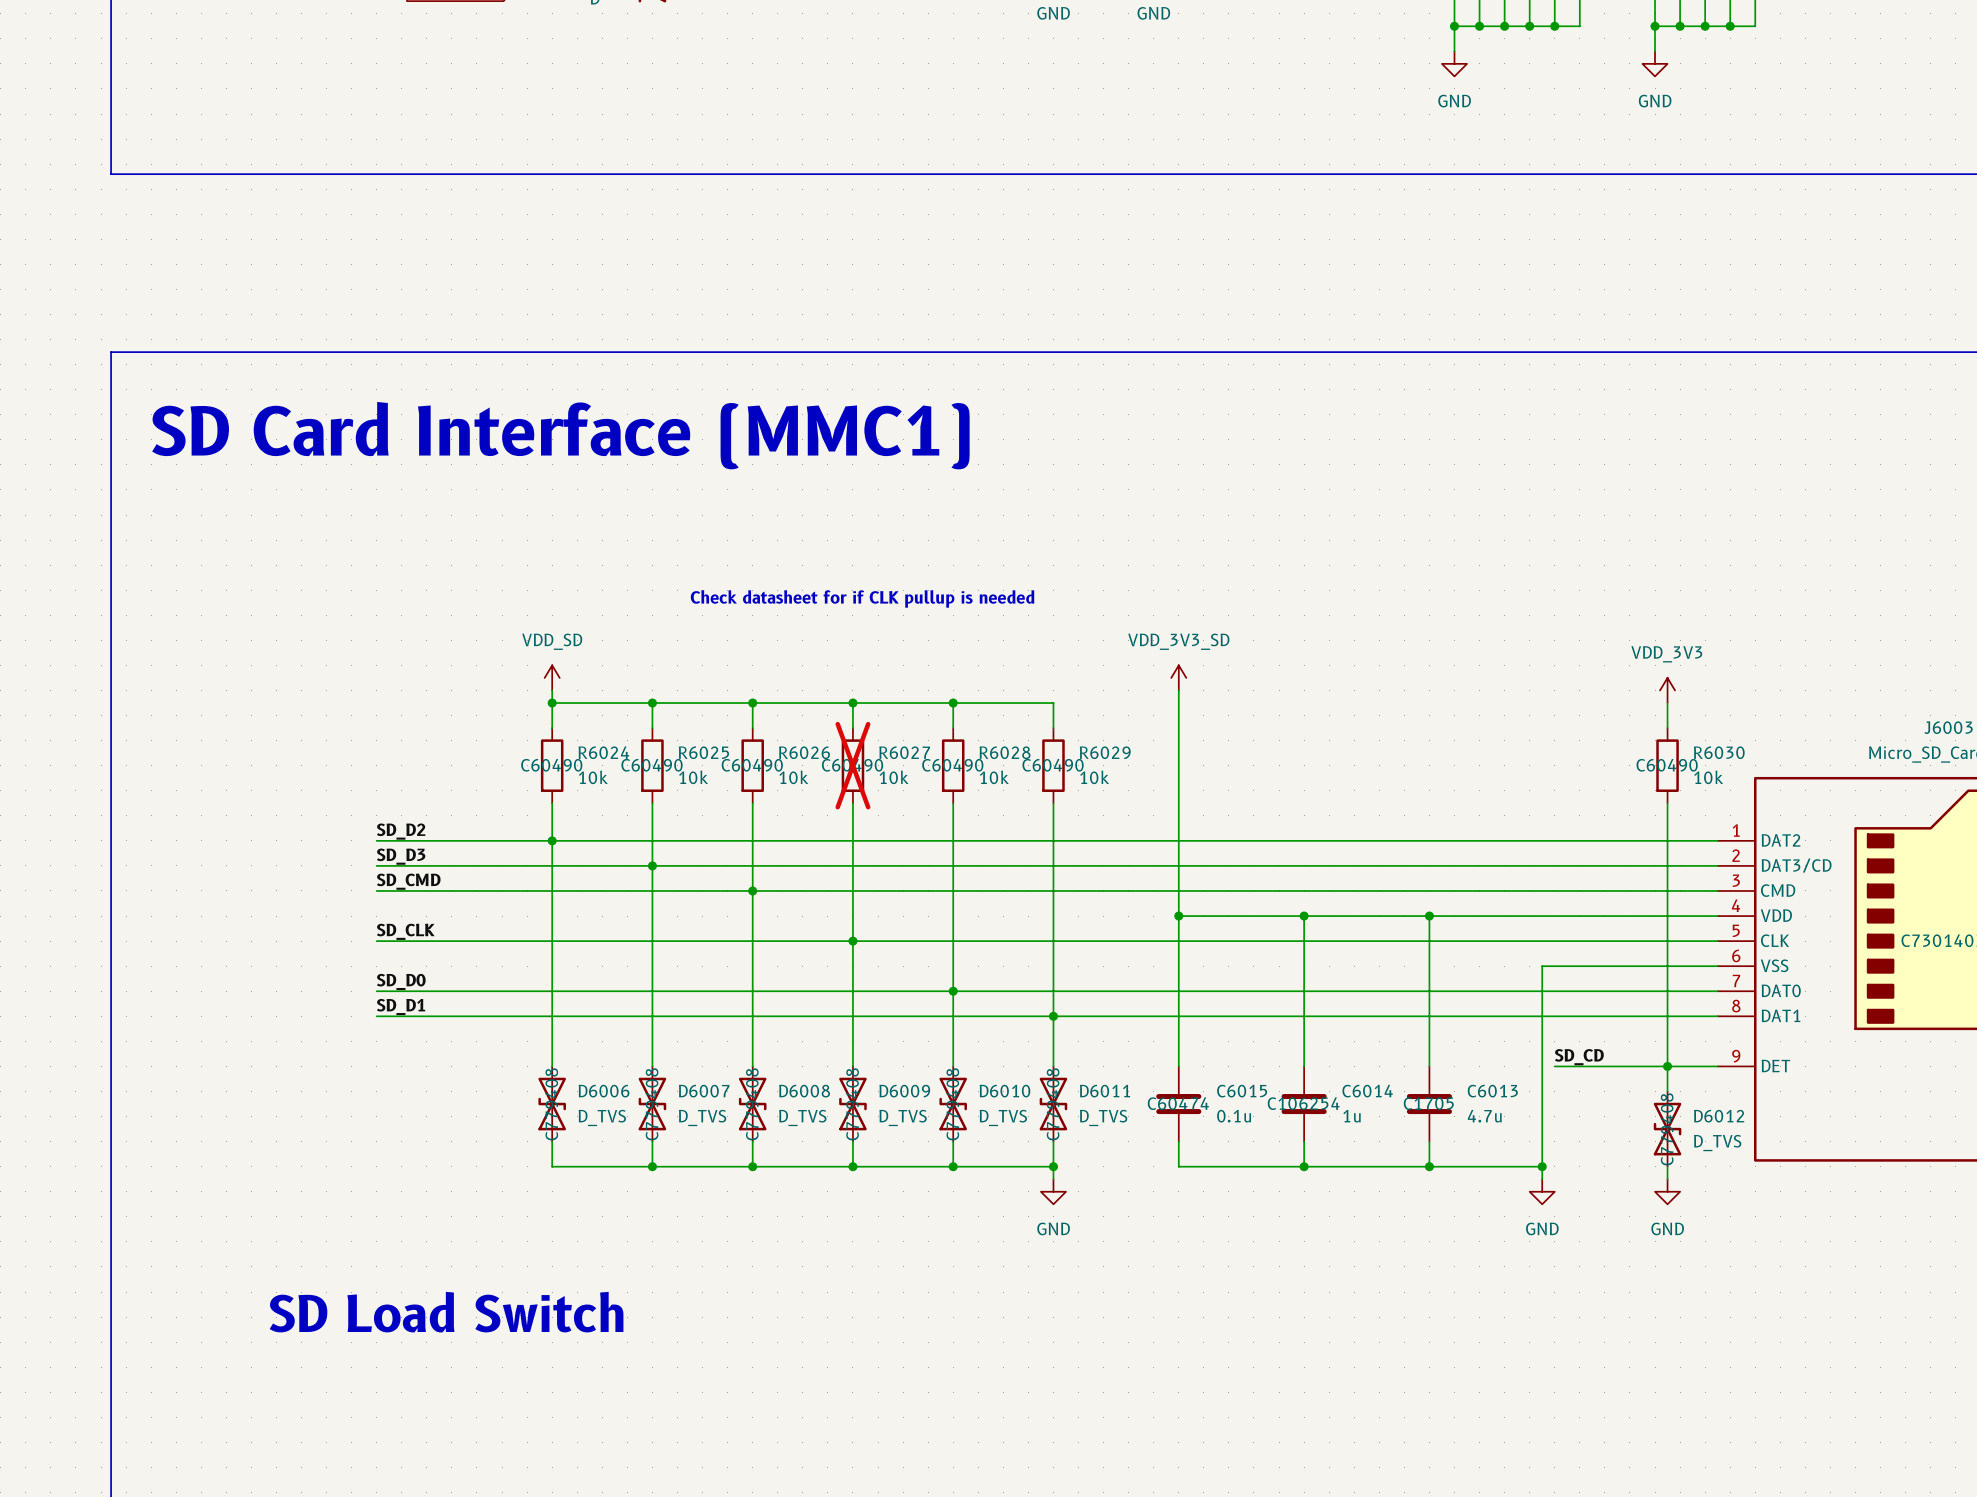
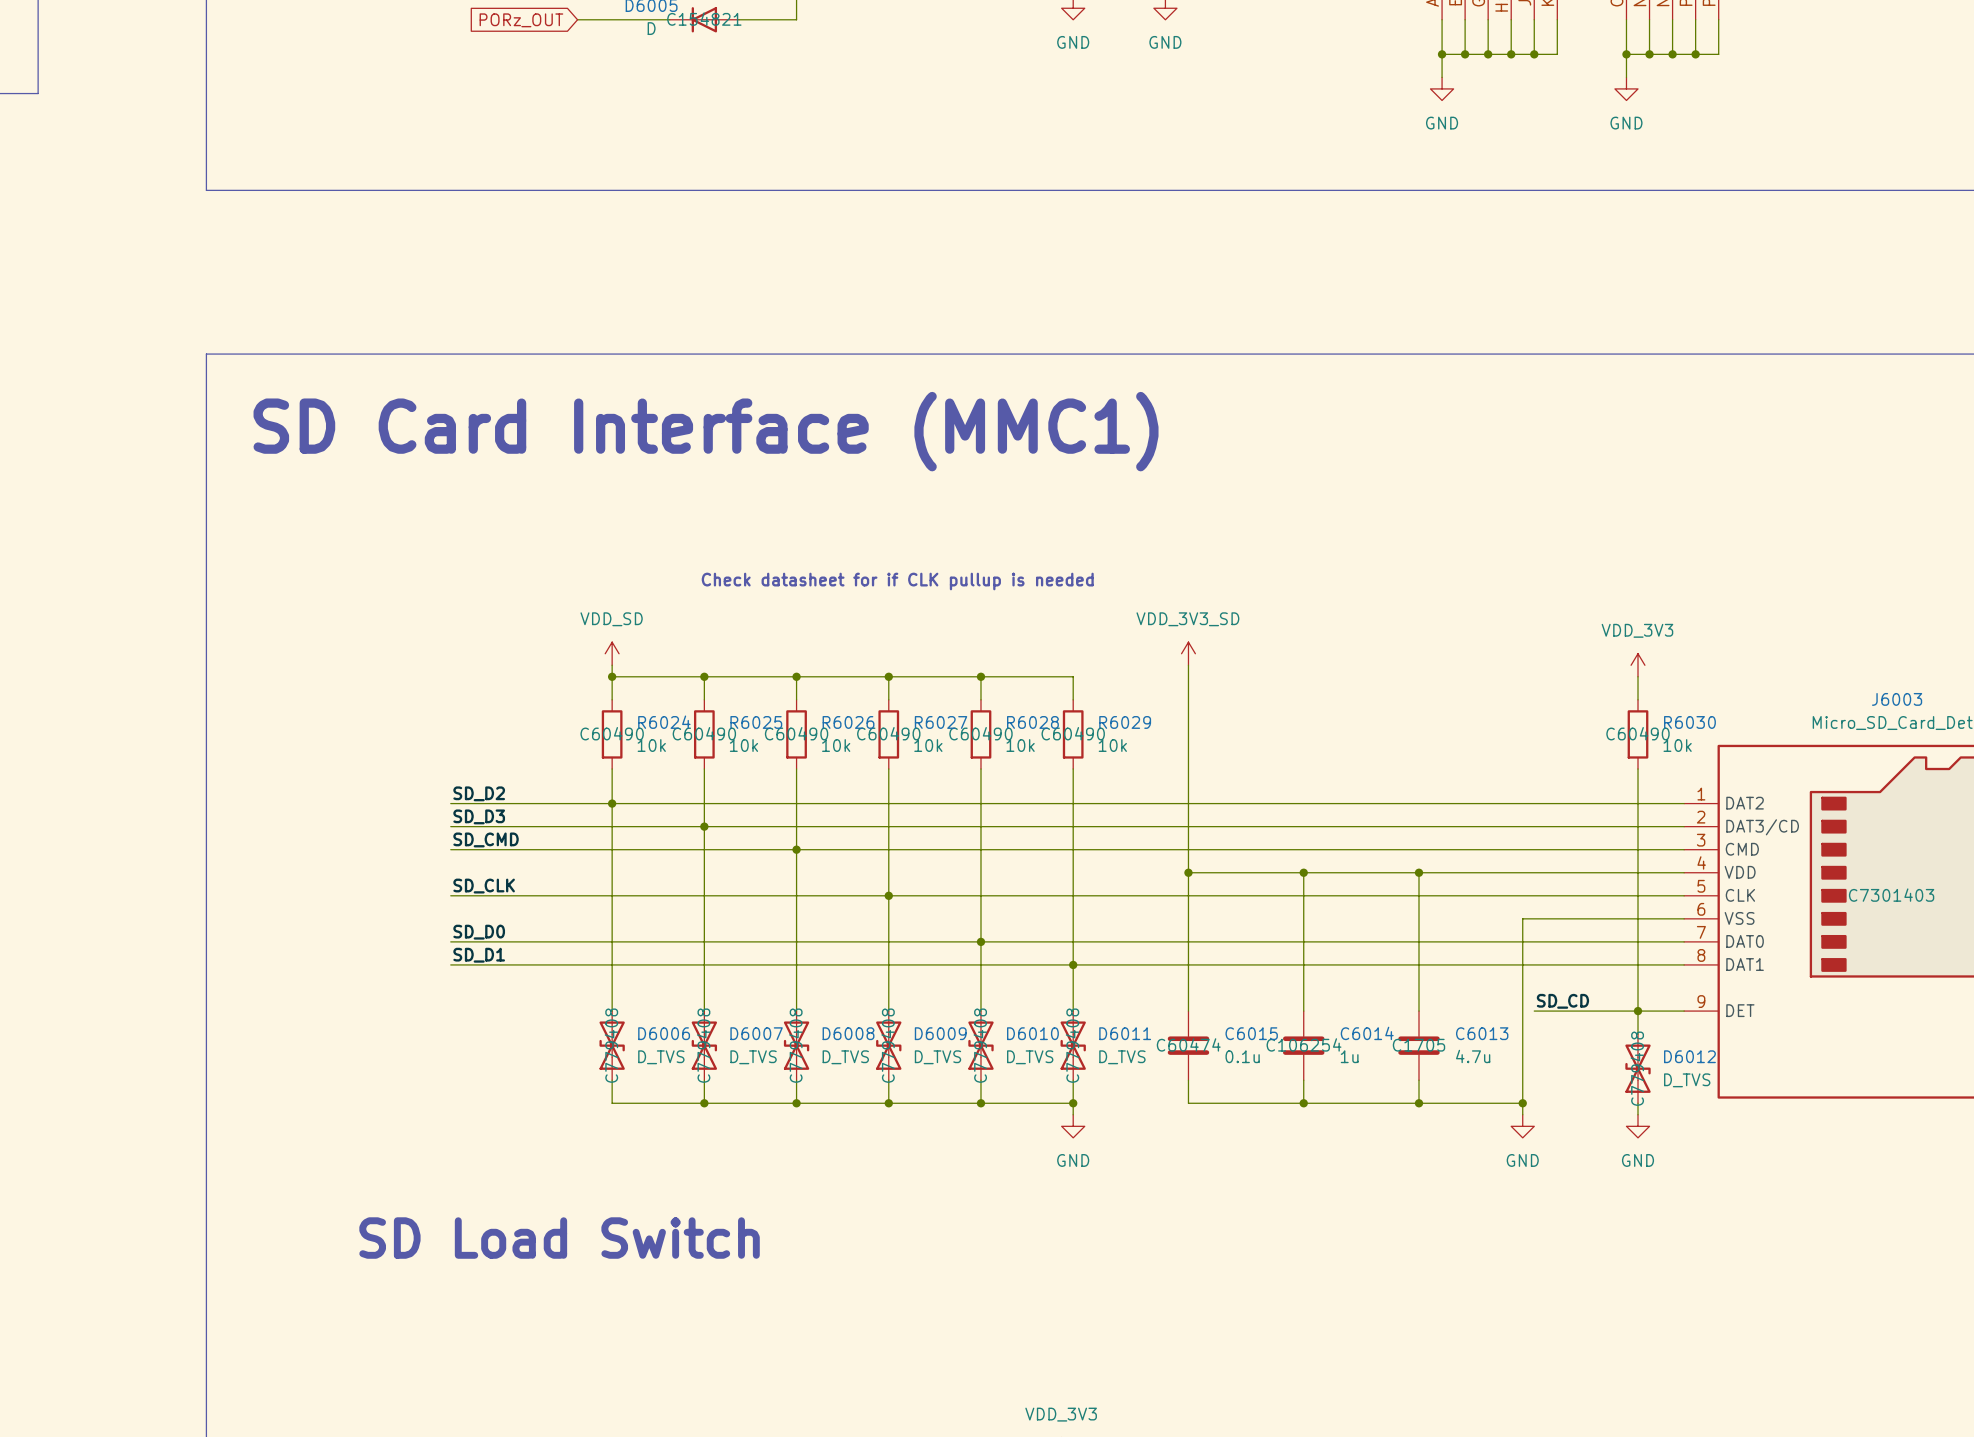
R6027 do-not-place cross: (852, 765) -> none

